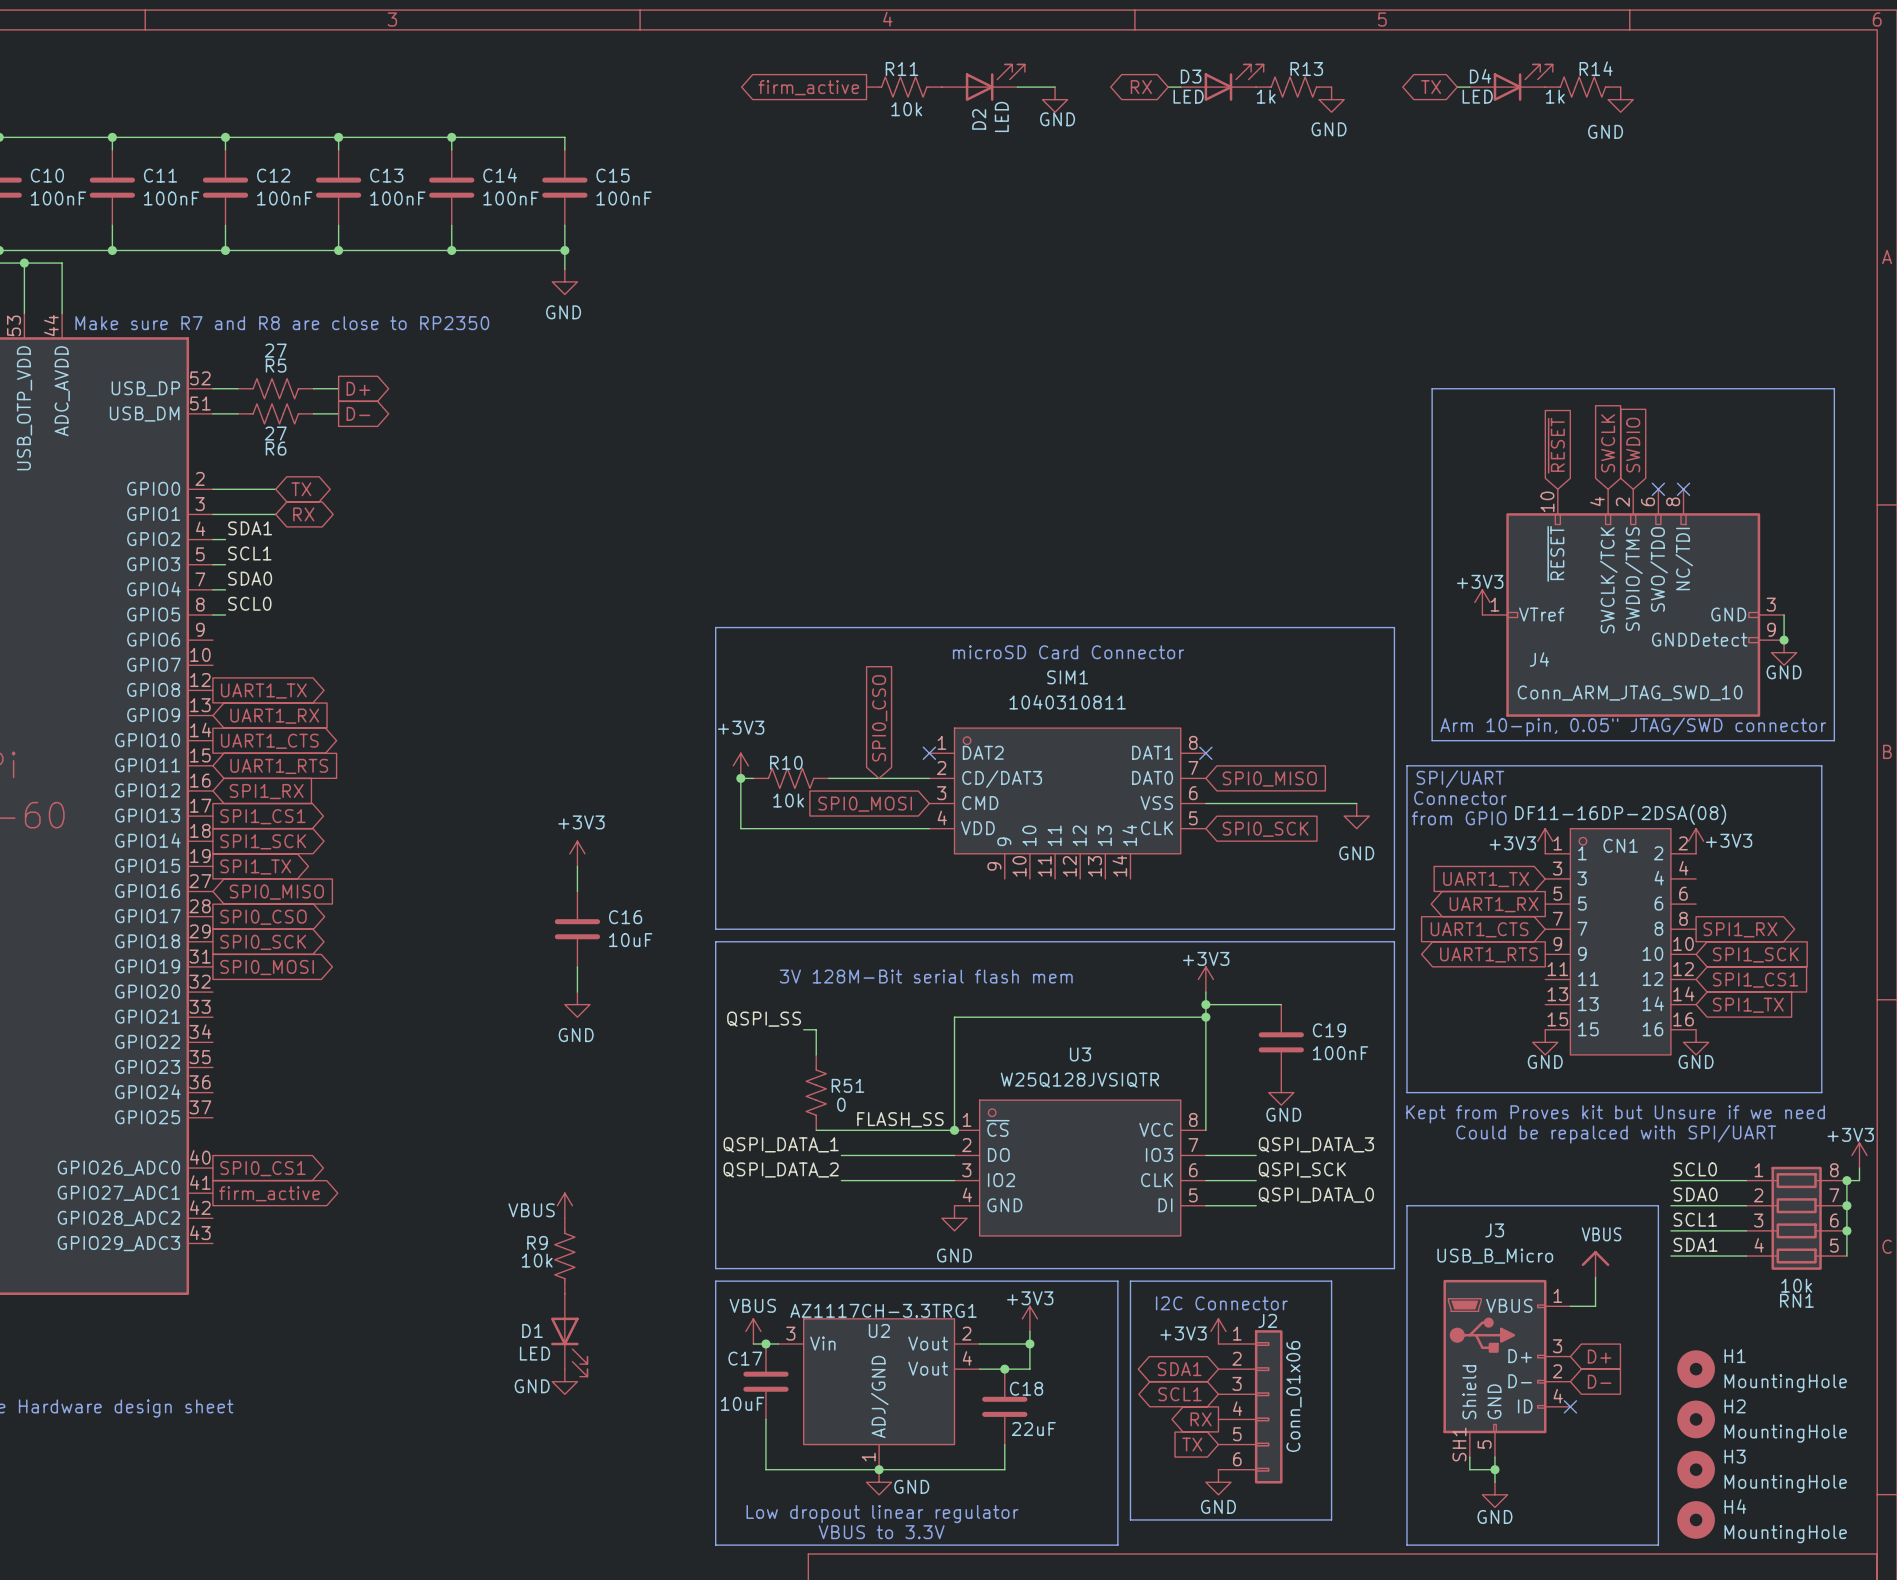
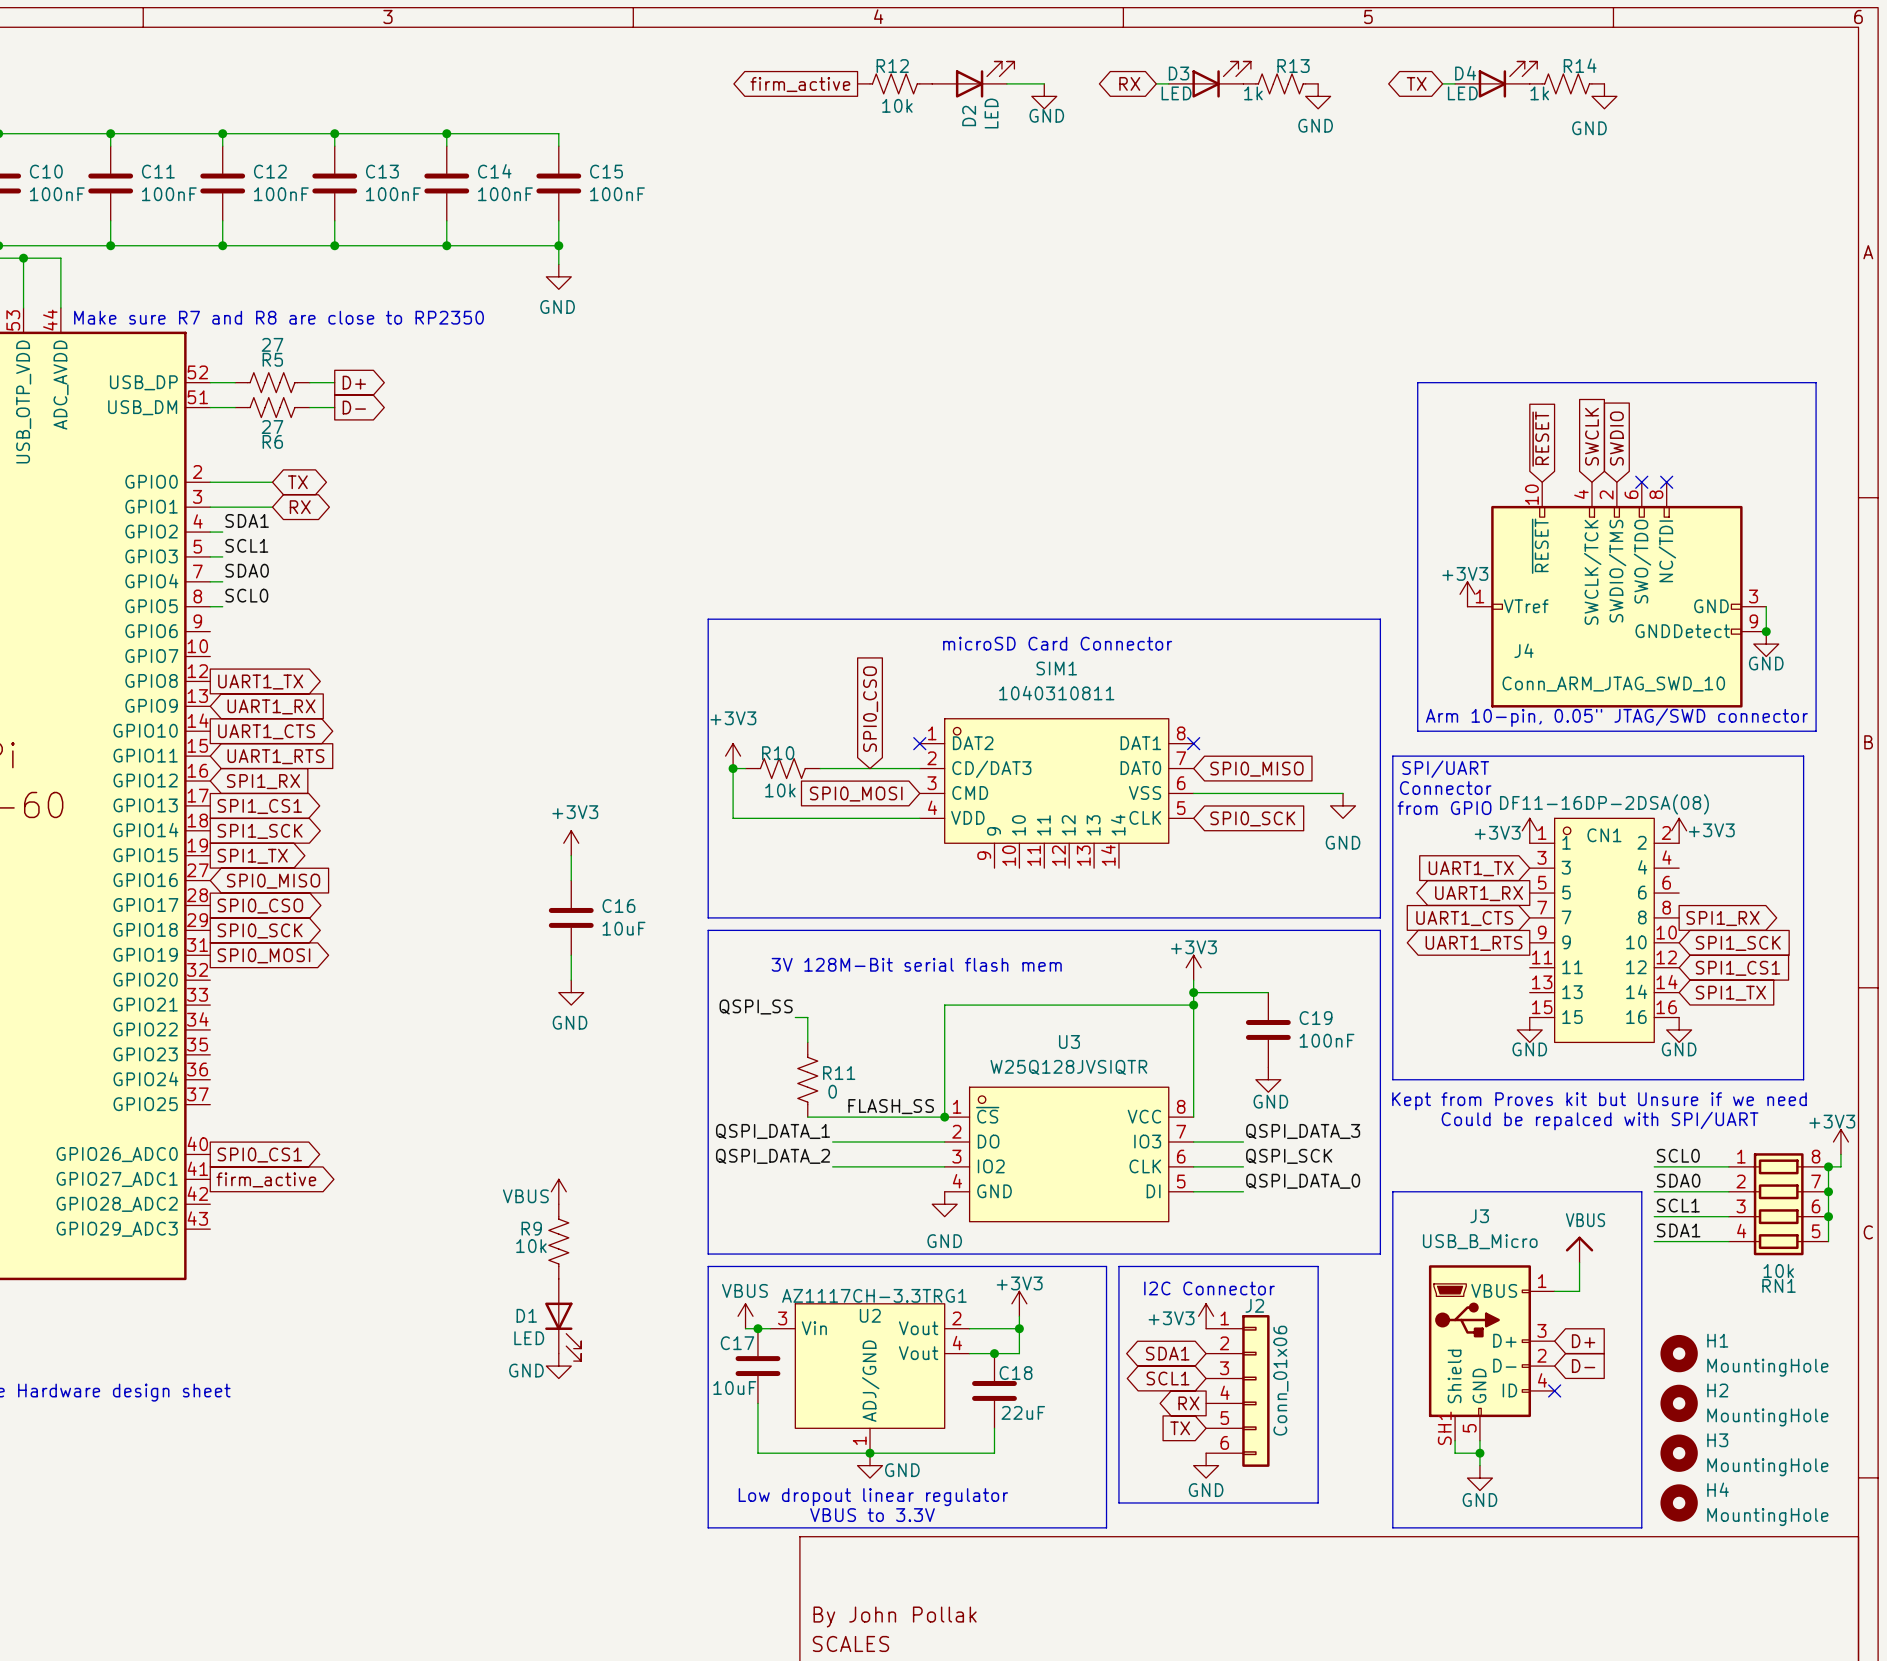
R11 name: R11 (902, 69) -> R12 (892, 66)
R51 name: R51 (847, 1085) -> R11 (839, 1073)

